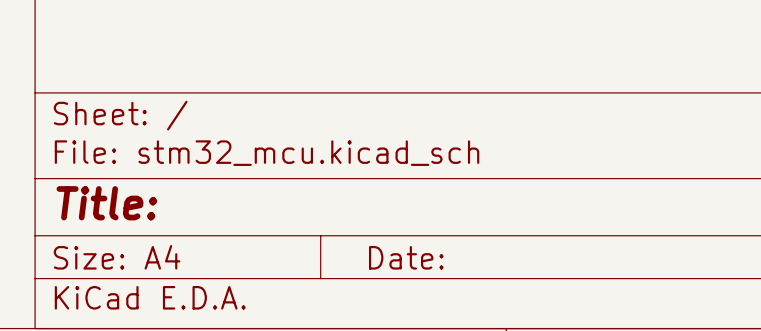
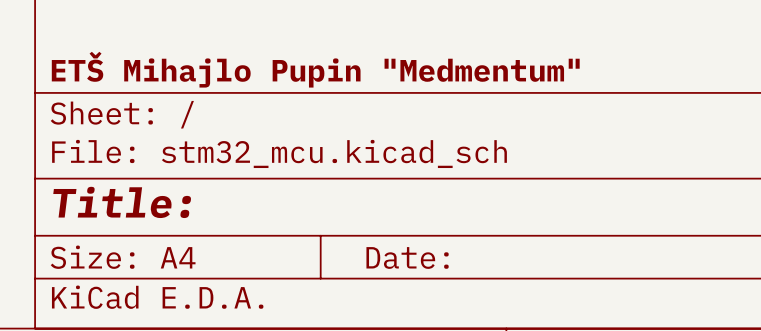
title block: none -> ETŠ Mihajlo Pupin "Medmentum" (315, 69)

